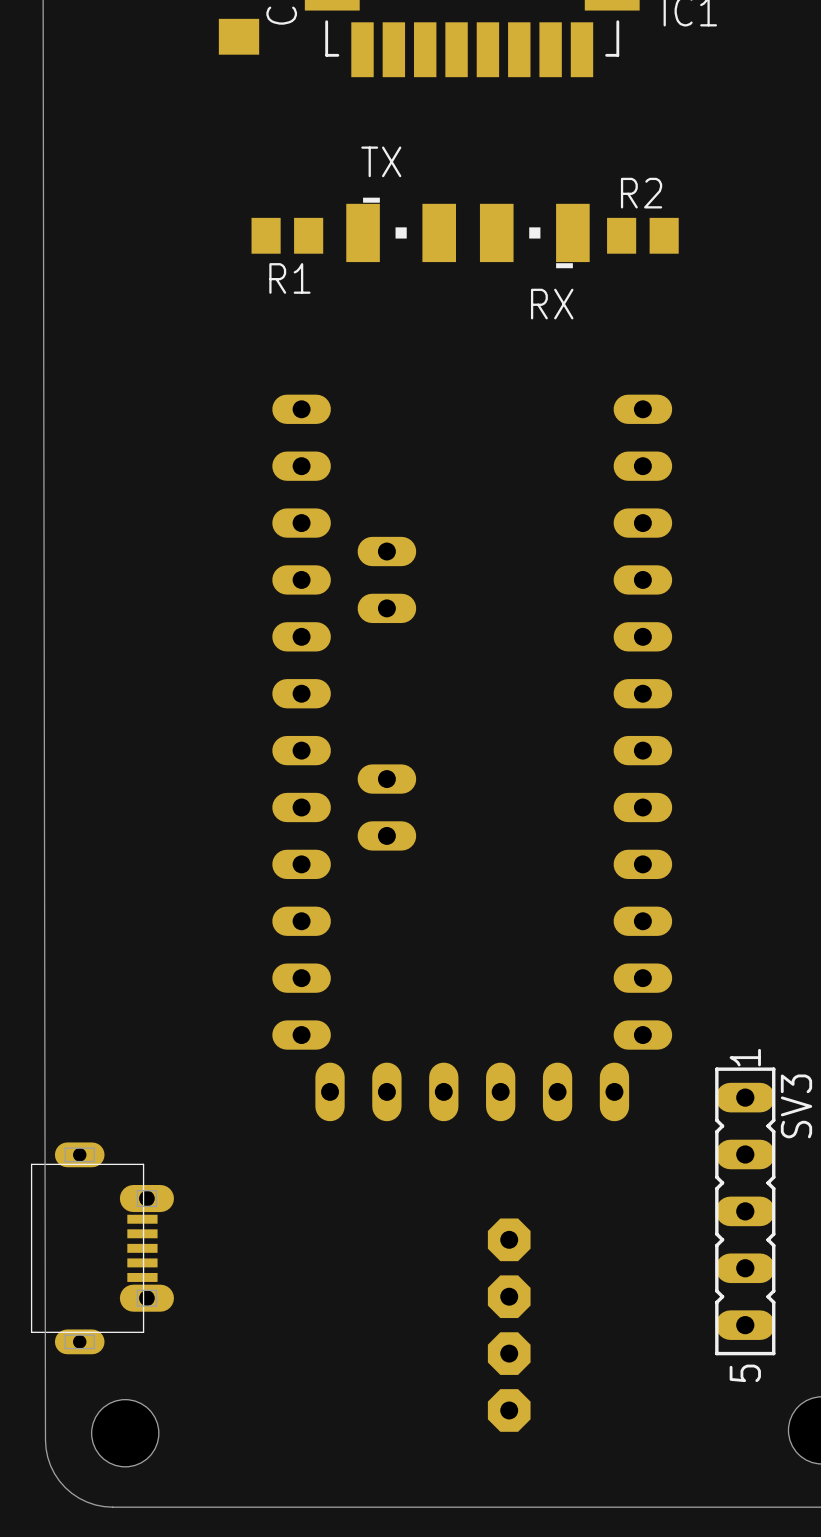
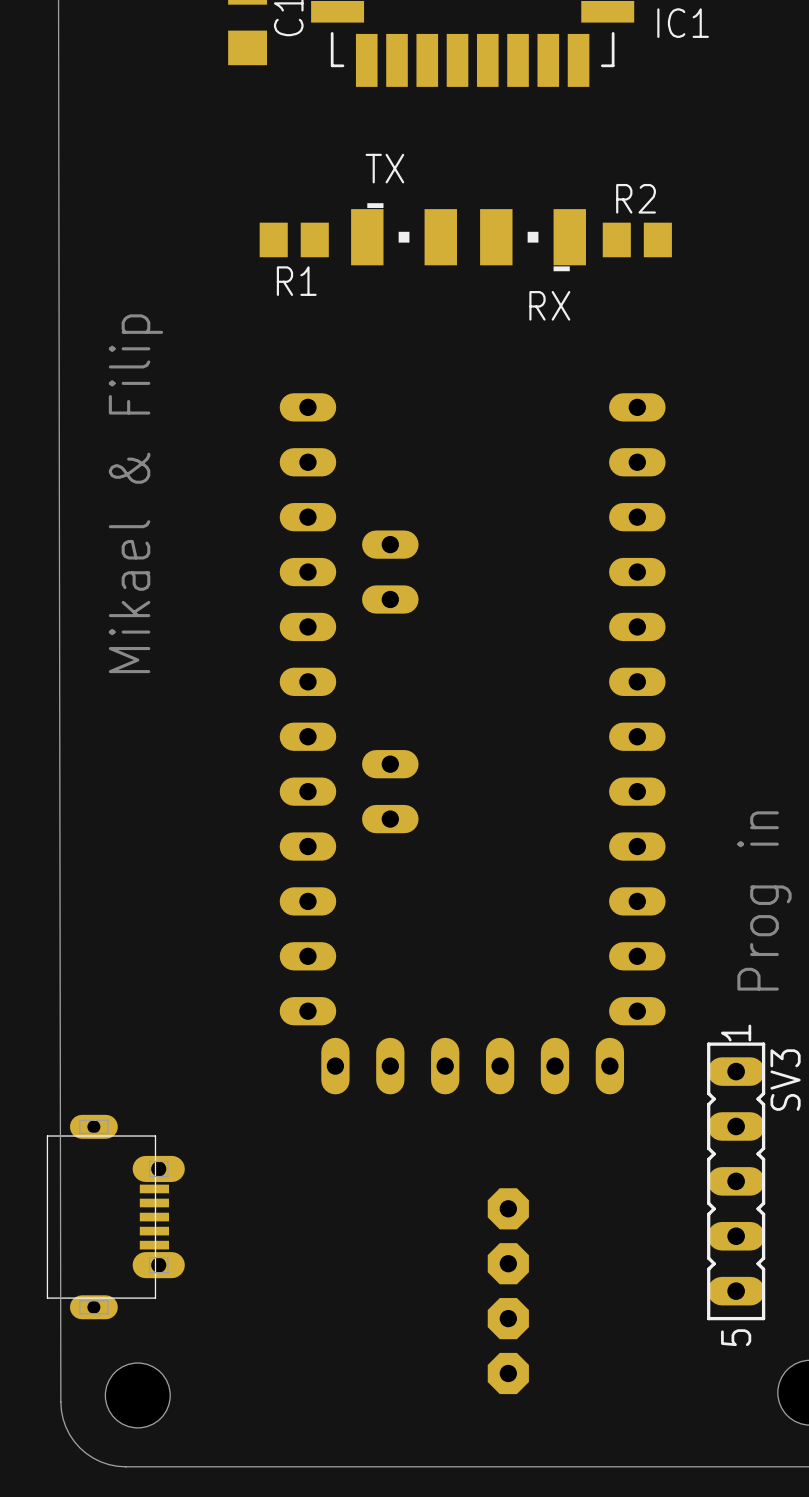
text: none -> Mikael & Filip (135, 493)
text: none -> Prog in (764, 900)

